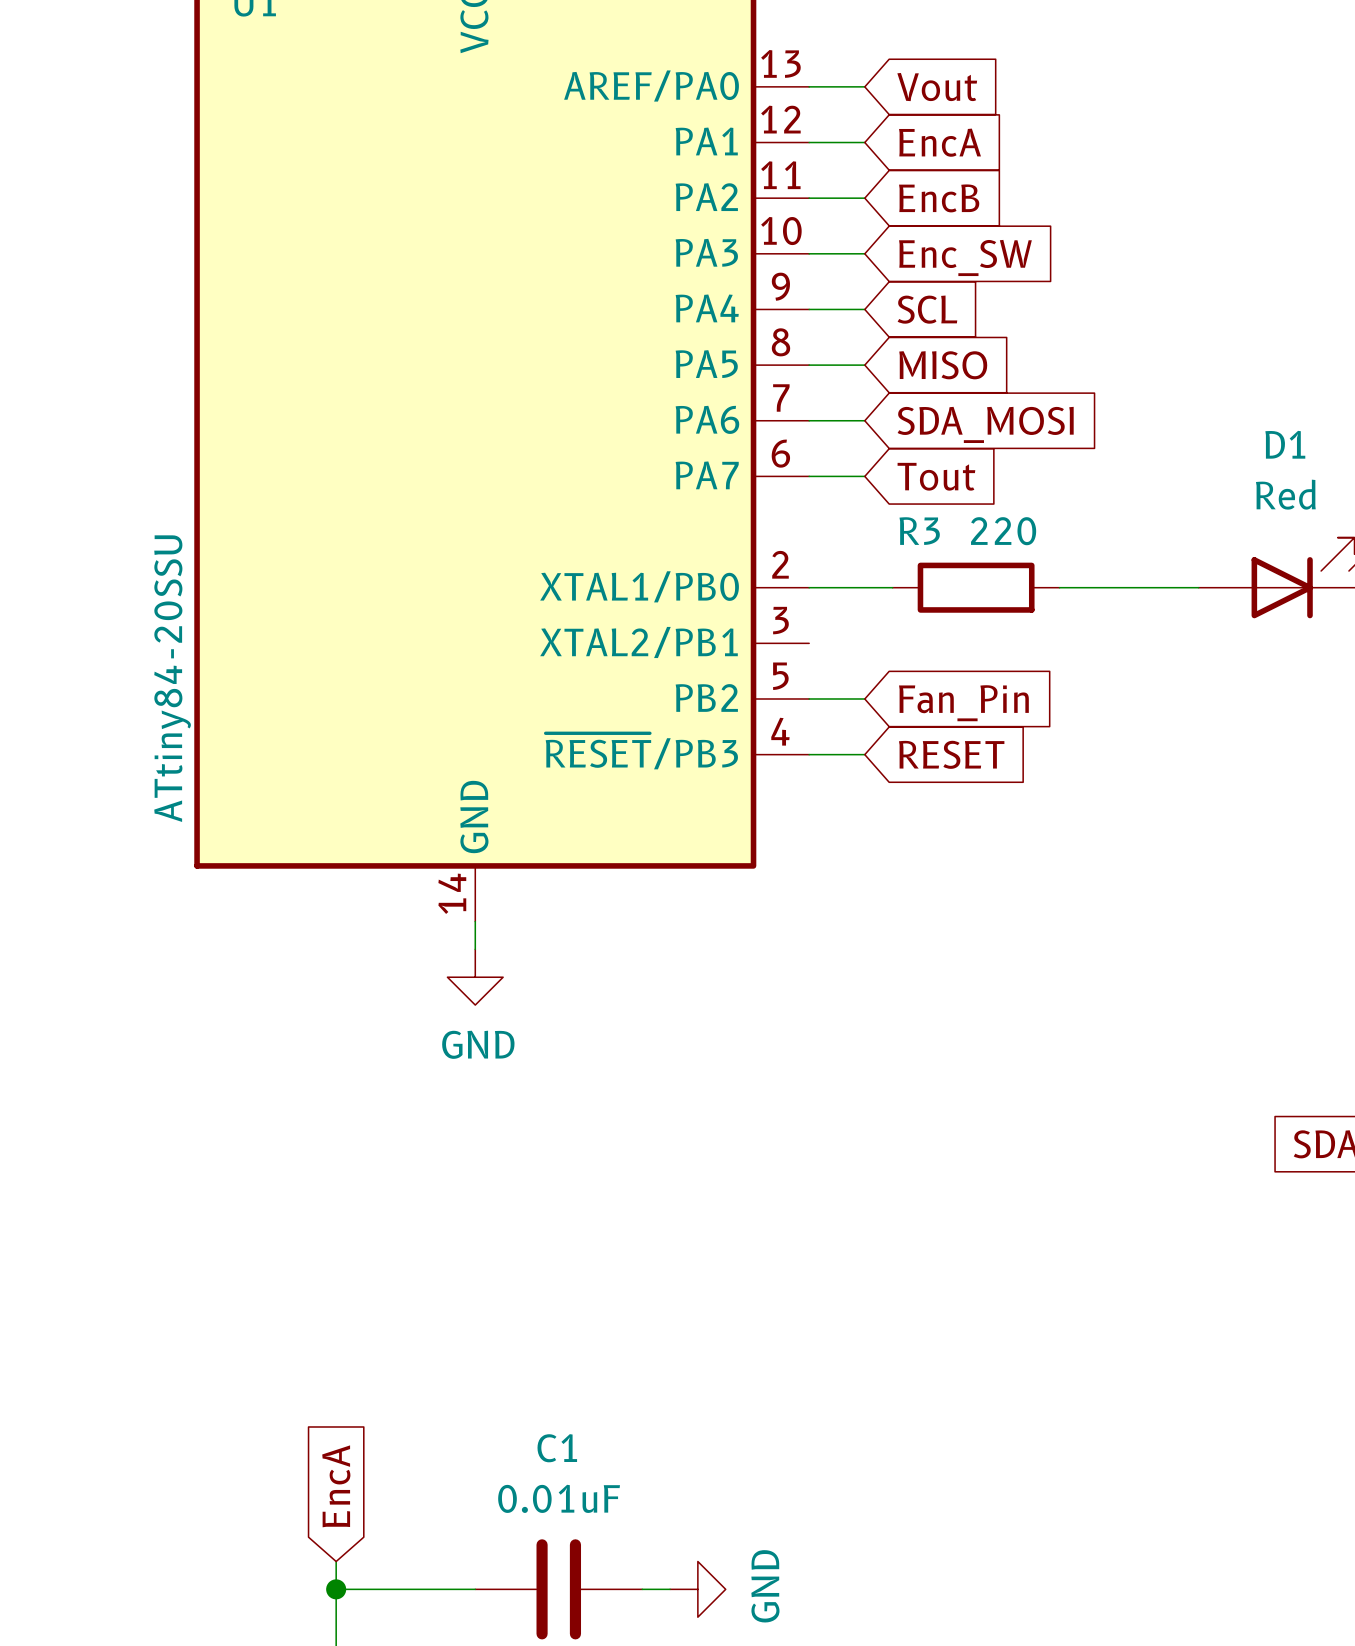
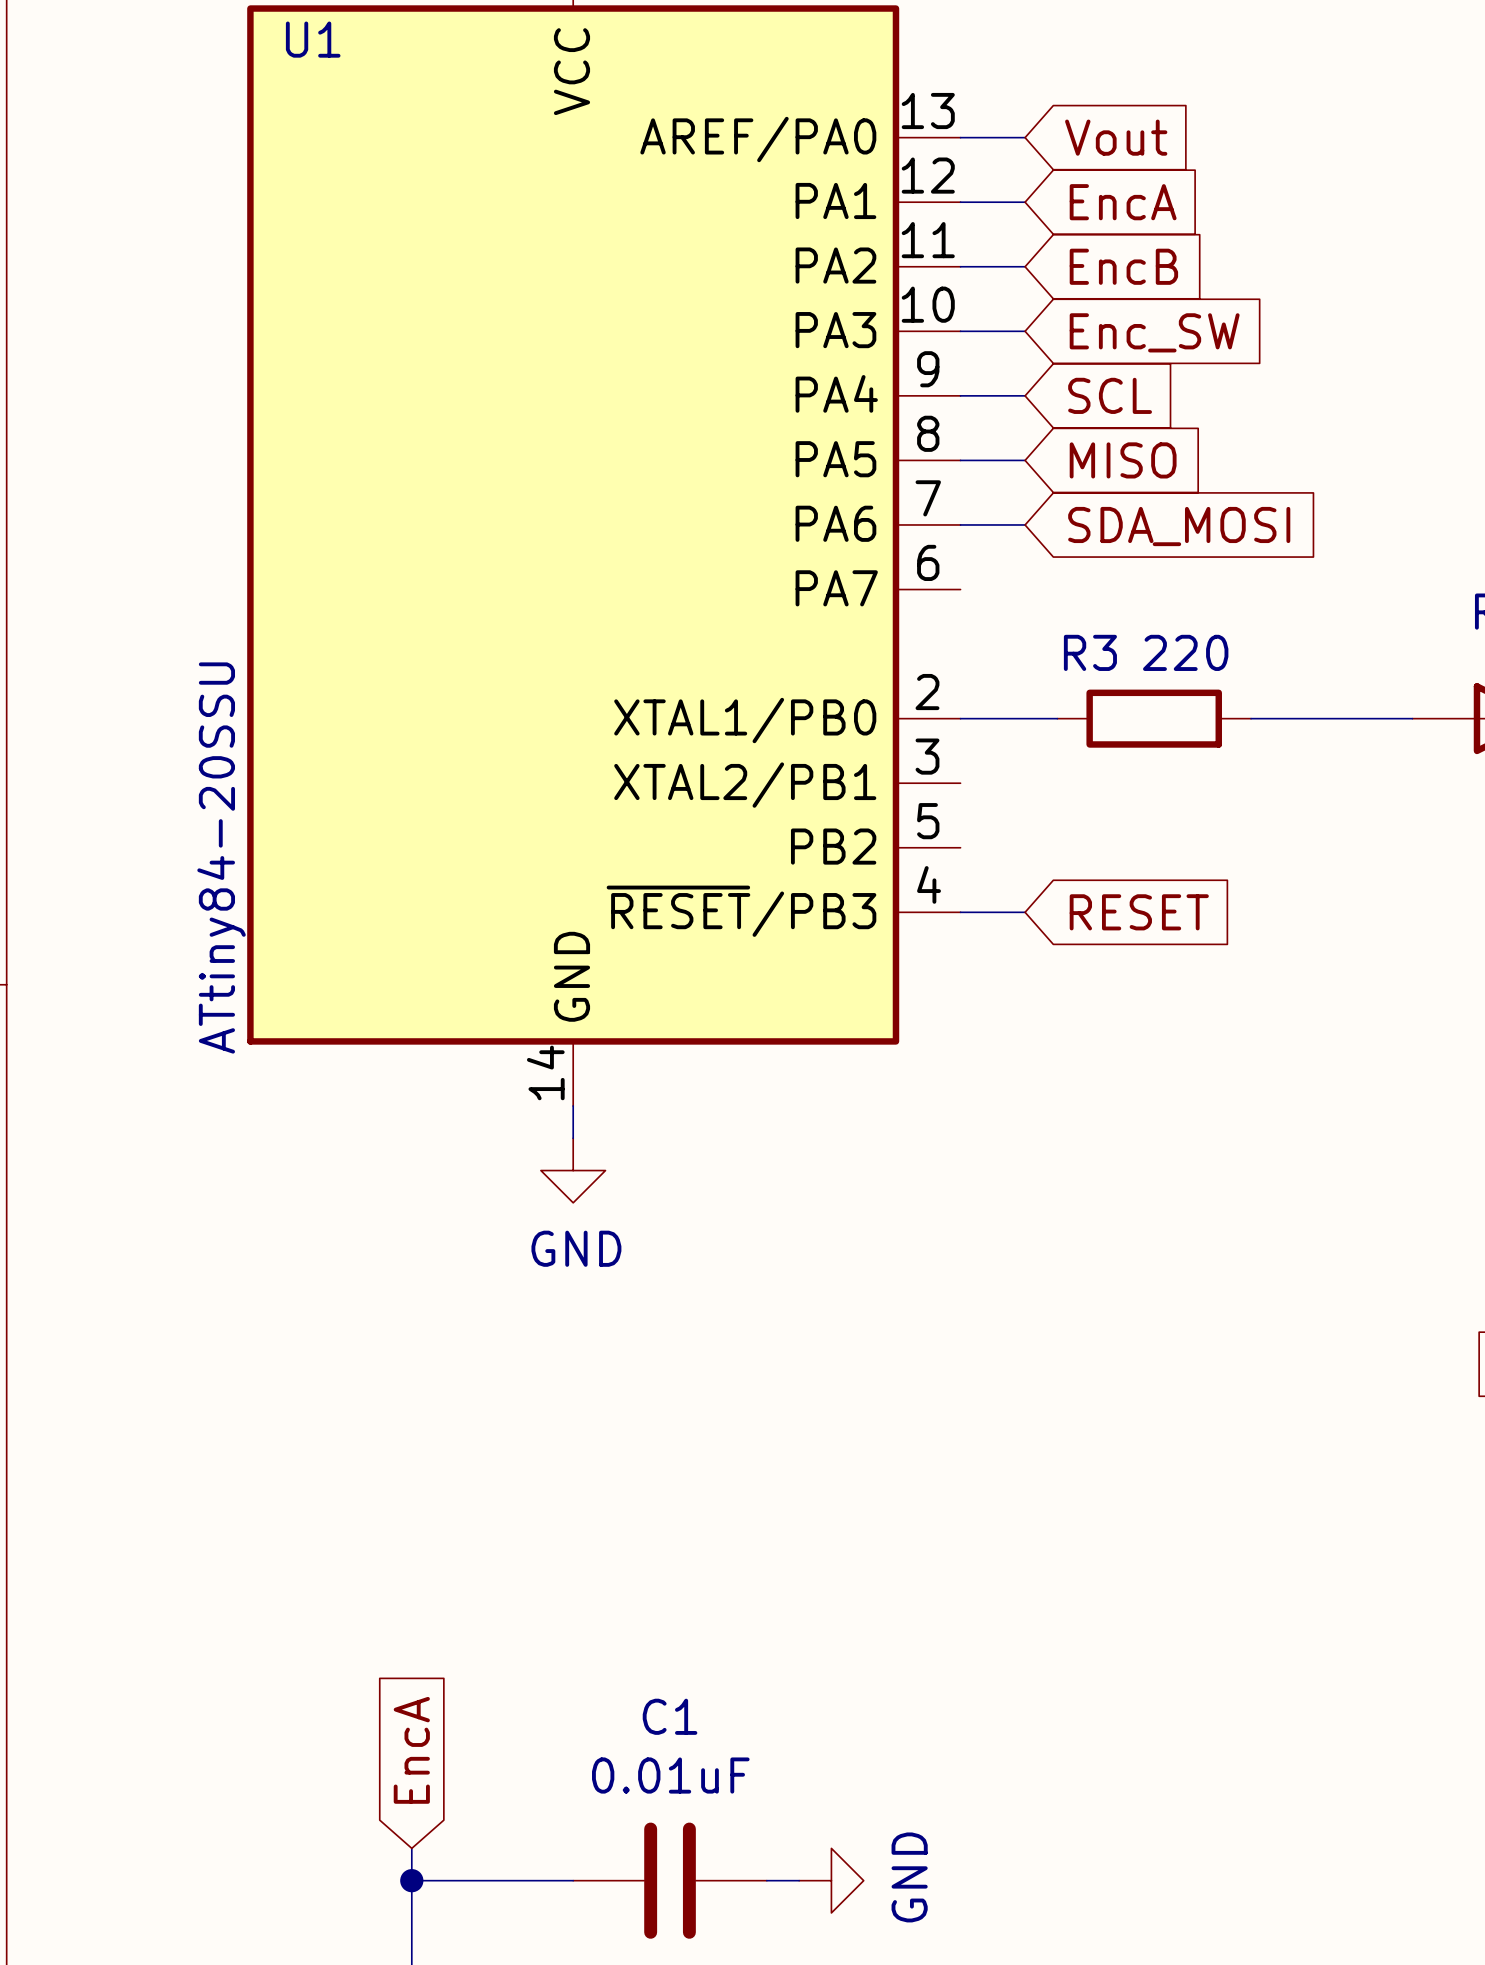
wire: (809, 476) (864, 476) -> none
global label: Tout (936, 476) -> none
wire: (809, 698) (864, 698) -> none
global label: Fan_Pin (963, 703) -> none

